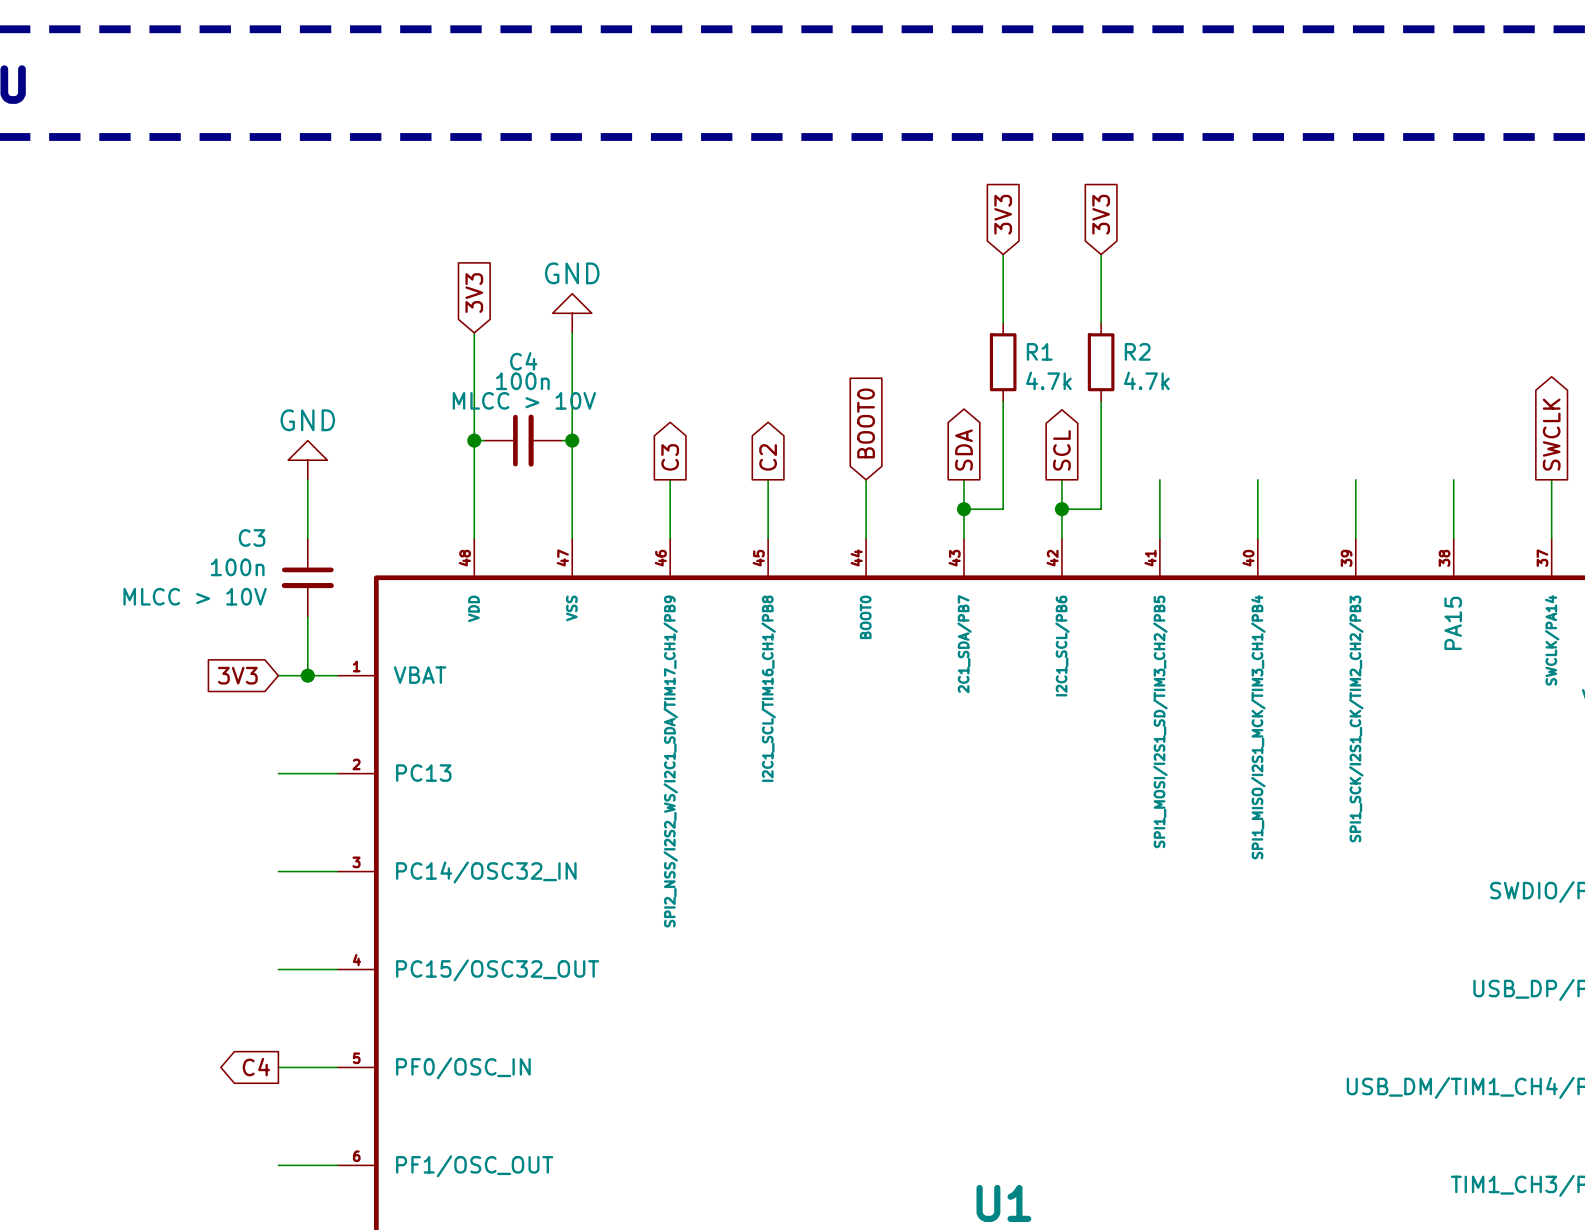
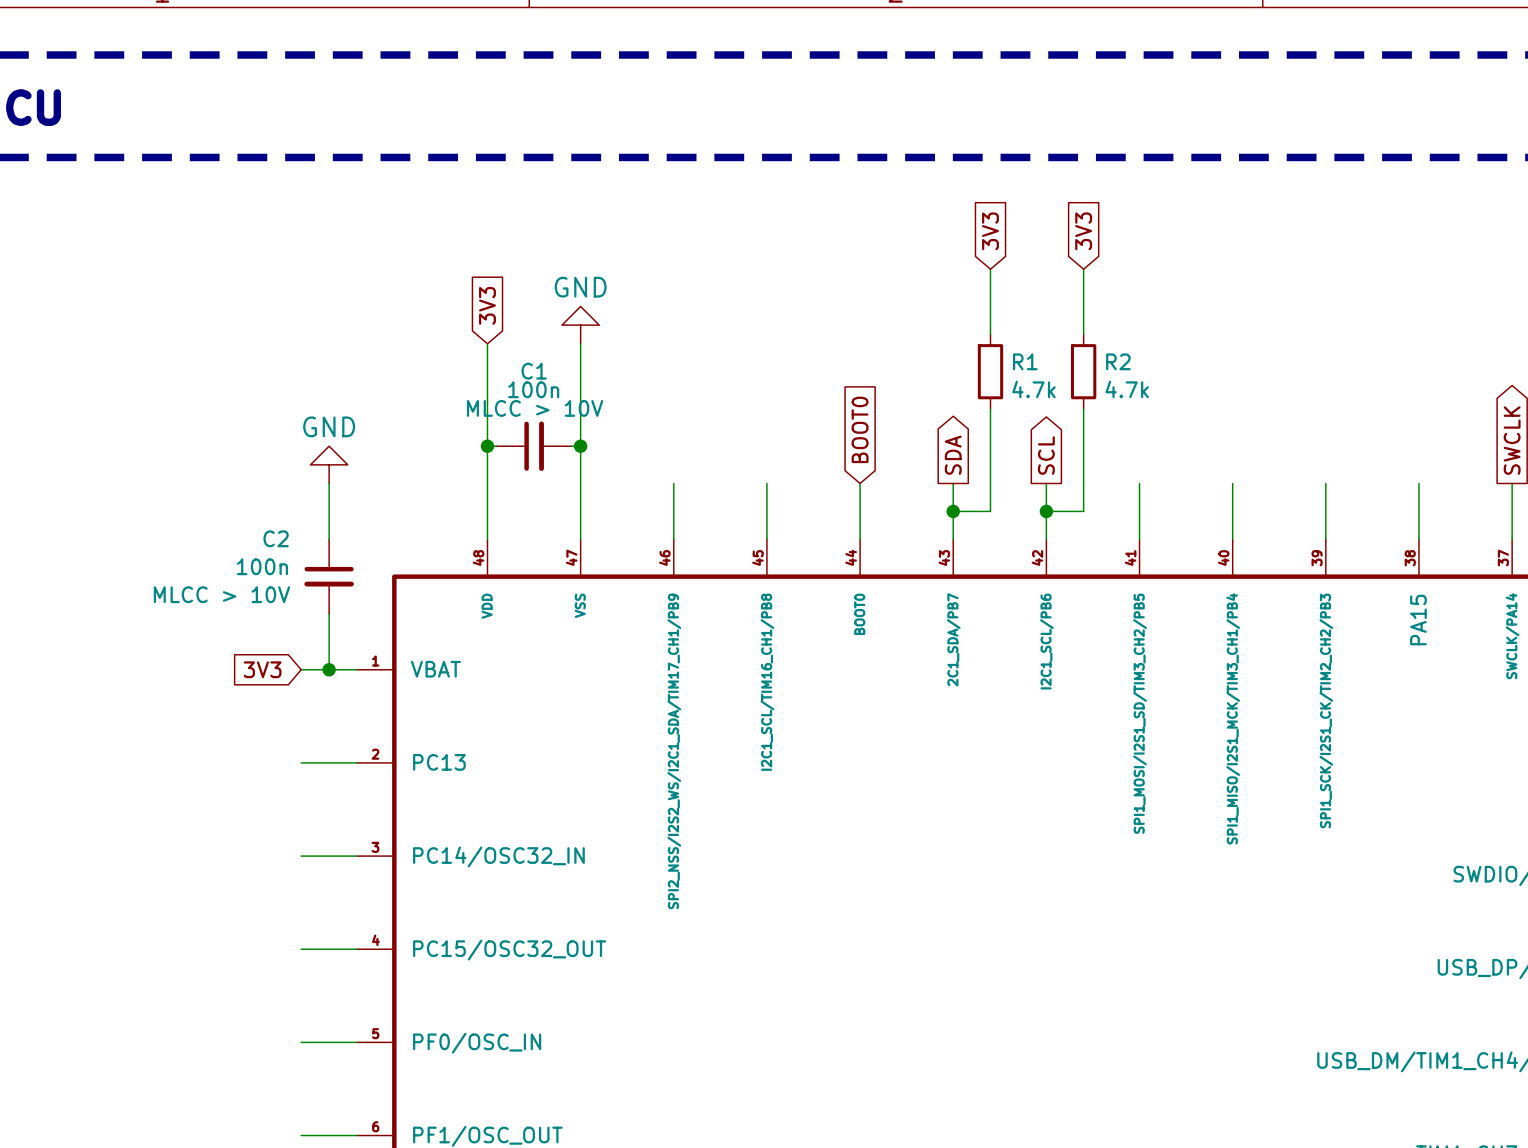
C4 name: C4 (523, 361) -> C1 (534, 371)
global label: C3 (670, 457) -> none
global label: C2 (768, 457) -> none
C3 name: C3 (252, 537) -> C2 (276, 538)
global label: C4 (256, 1067) -> none

